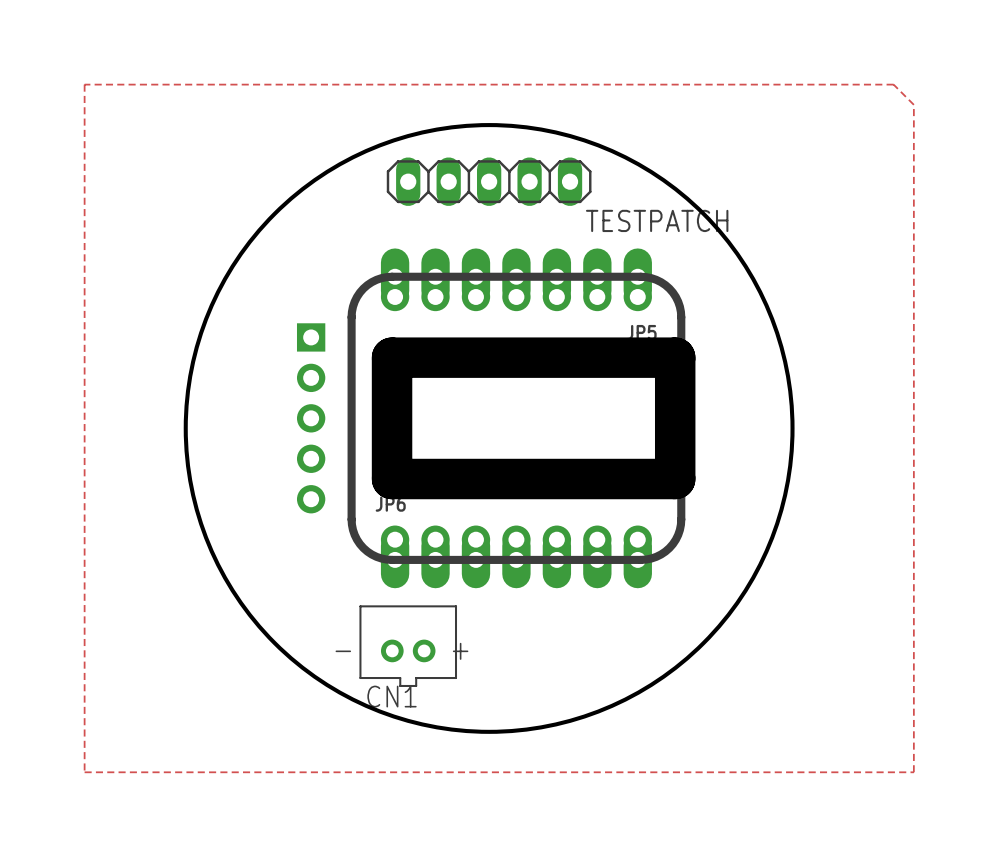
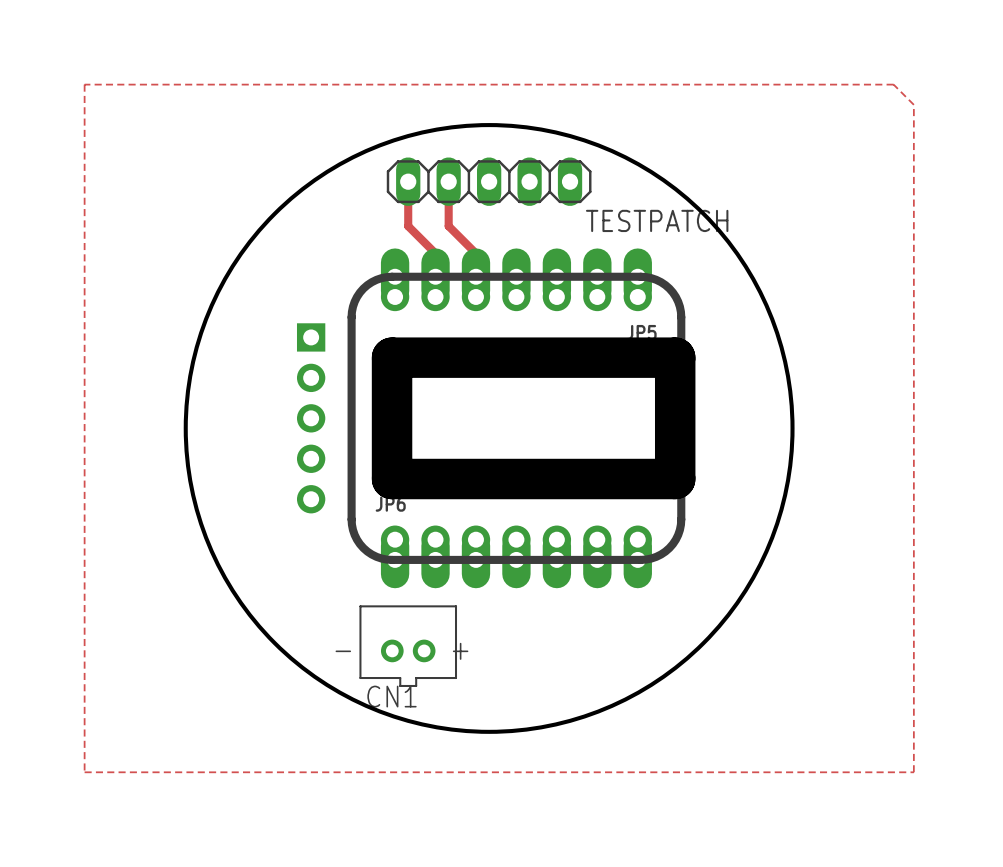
track: none -> (408, 181) (408, 226) (435, 253) (435, 276)
track: none -> (448, 181) (448, 226) (475, 253) (475, 276)

